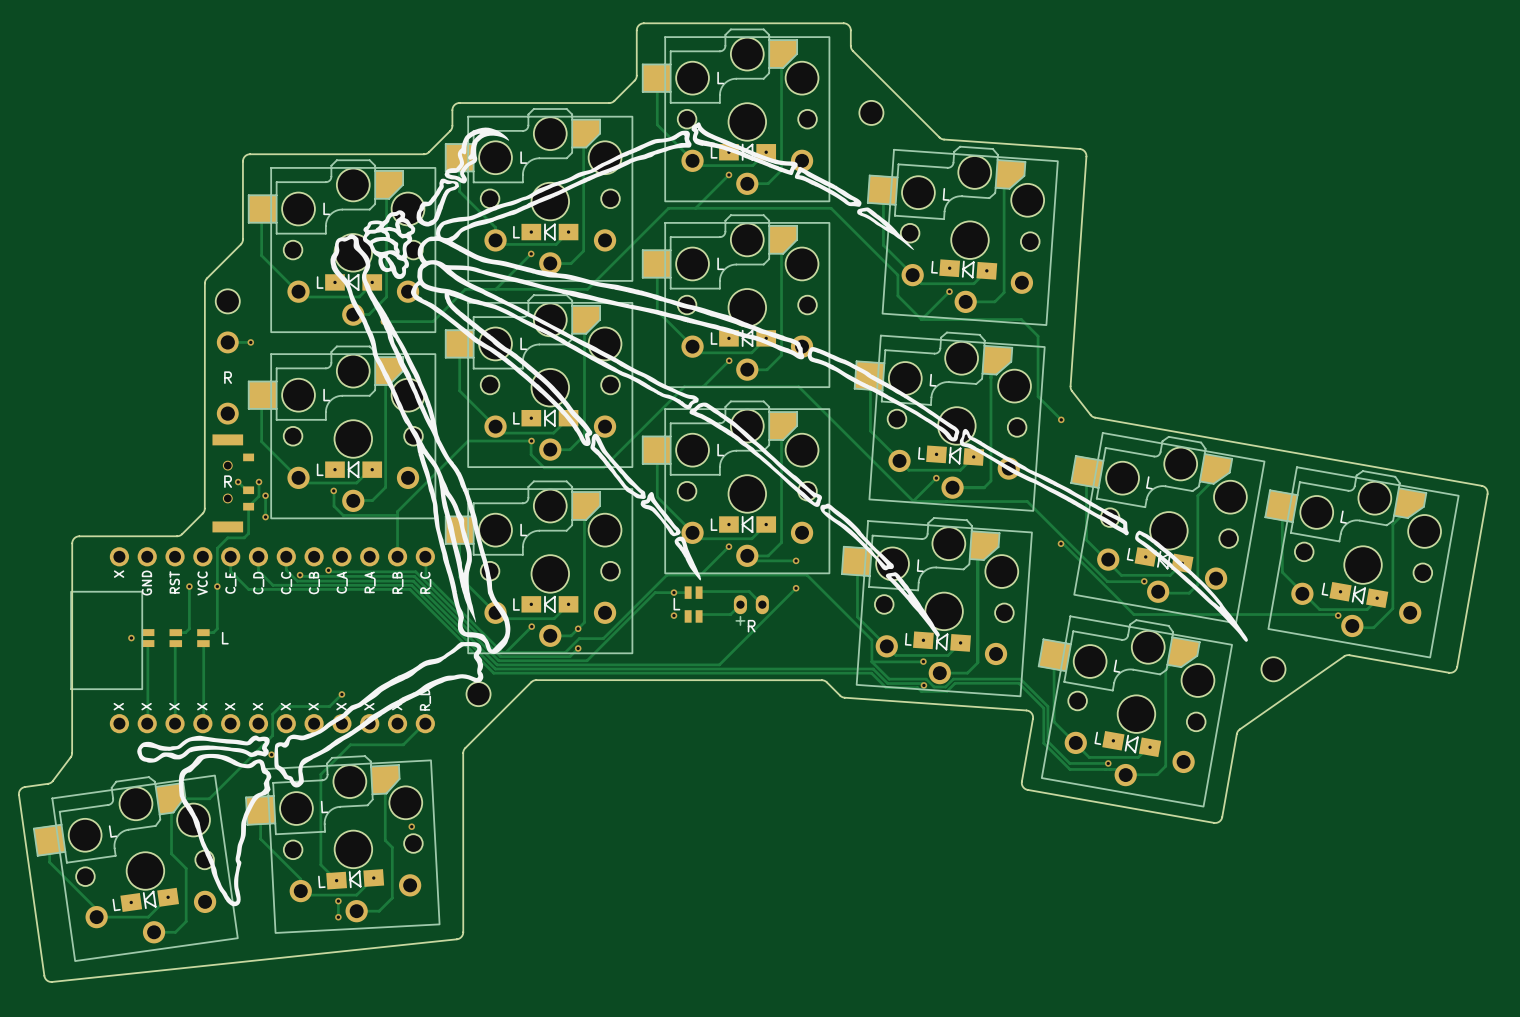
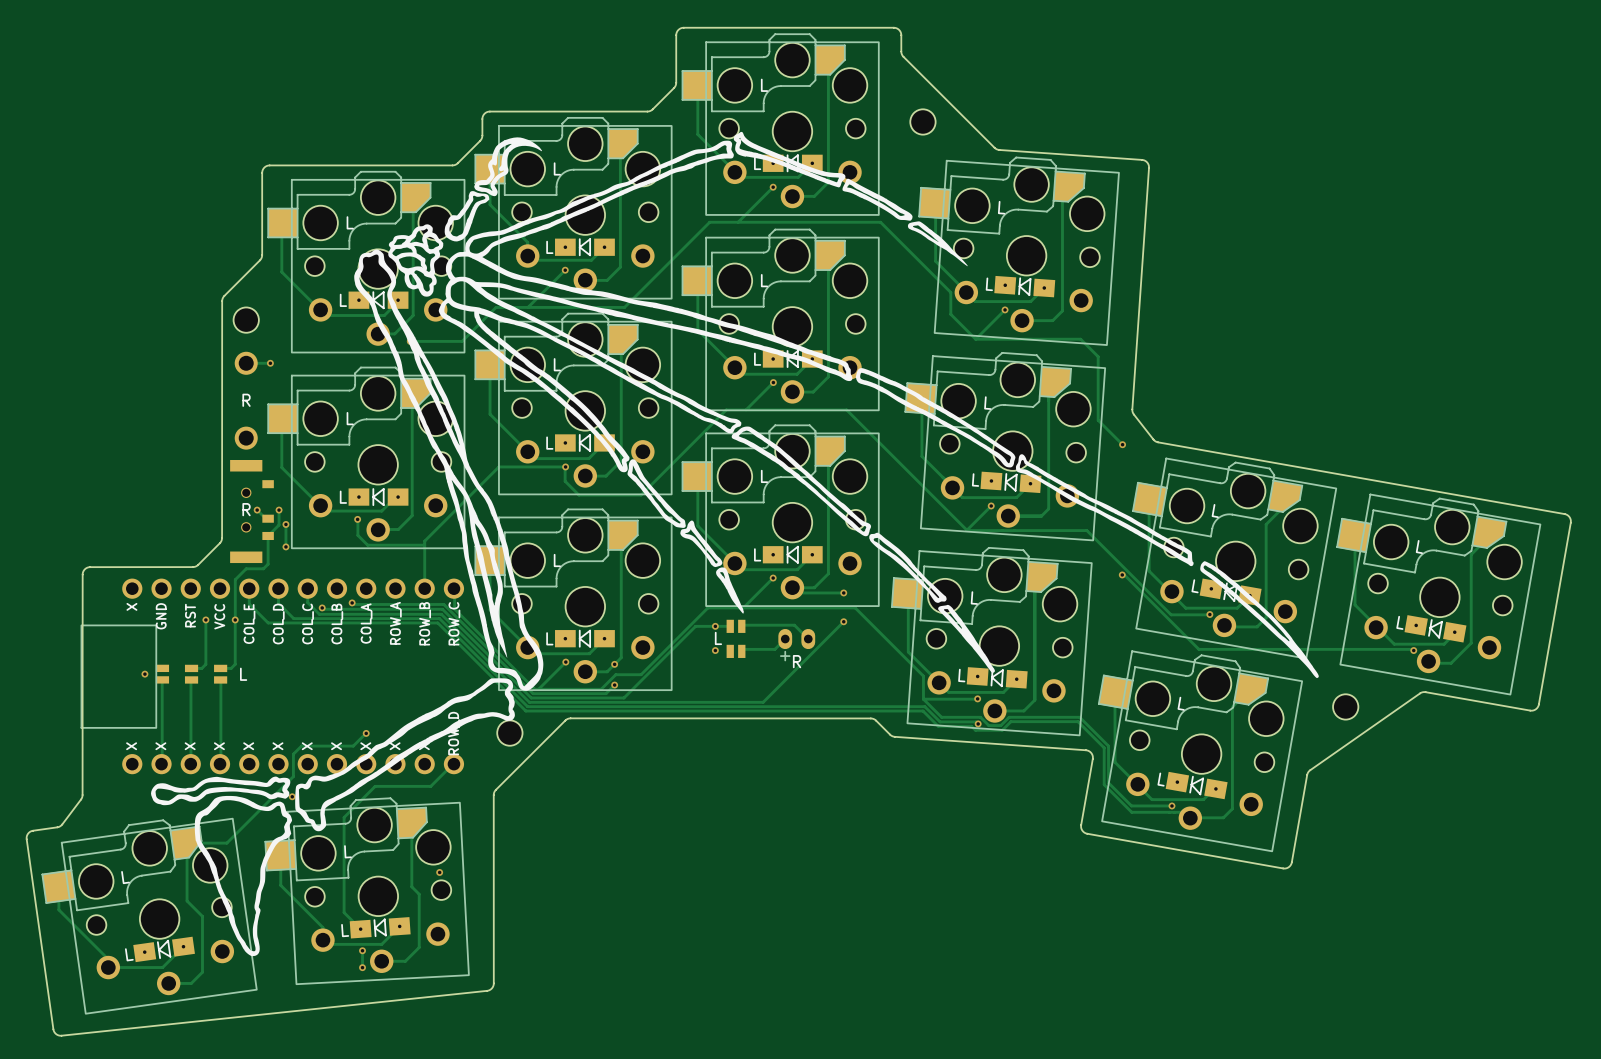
part footprint: [70, 547, 435, 734] -> [80, 578, 465, 775]

